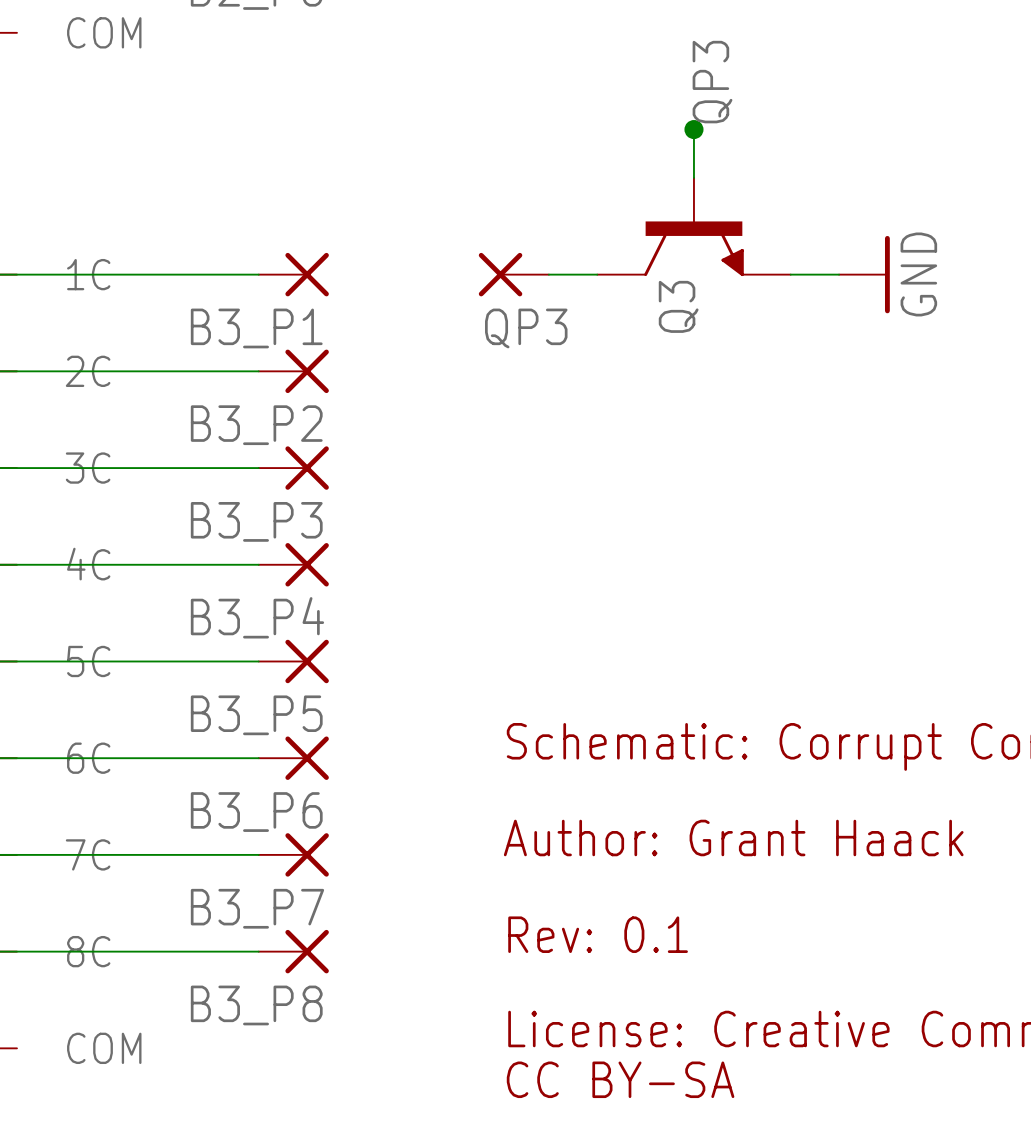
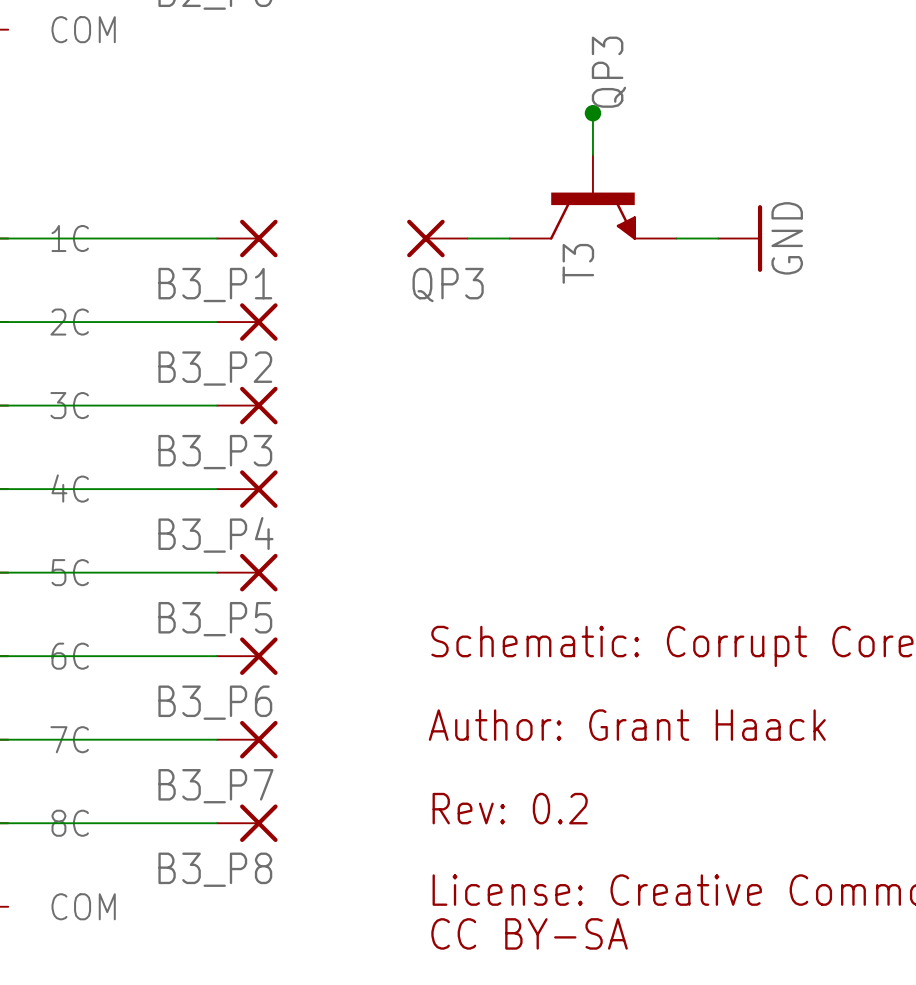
Q3 name: Q3 (678, 306) -> T3 (578, 263)
text: Rev: 0.1 (598, 934) -> Rev: 0.2 (510, 808)

